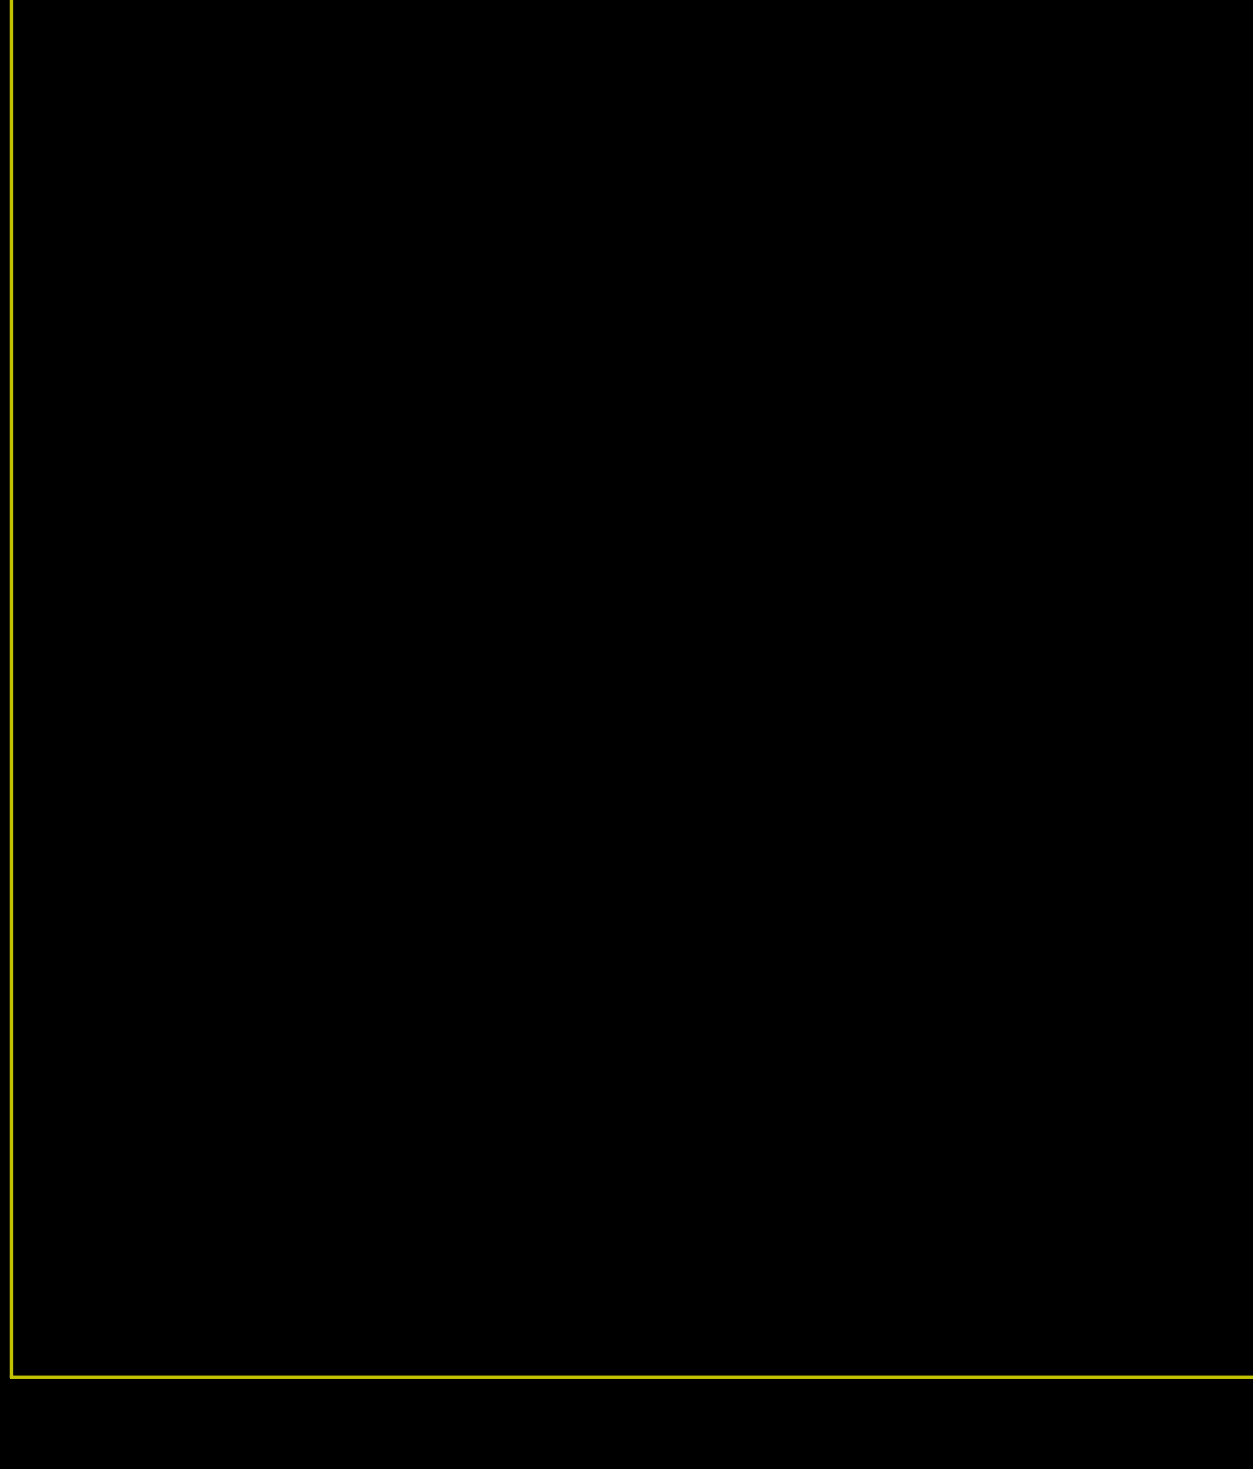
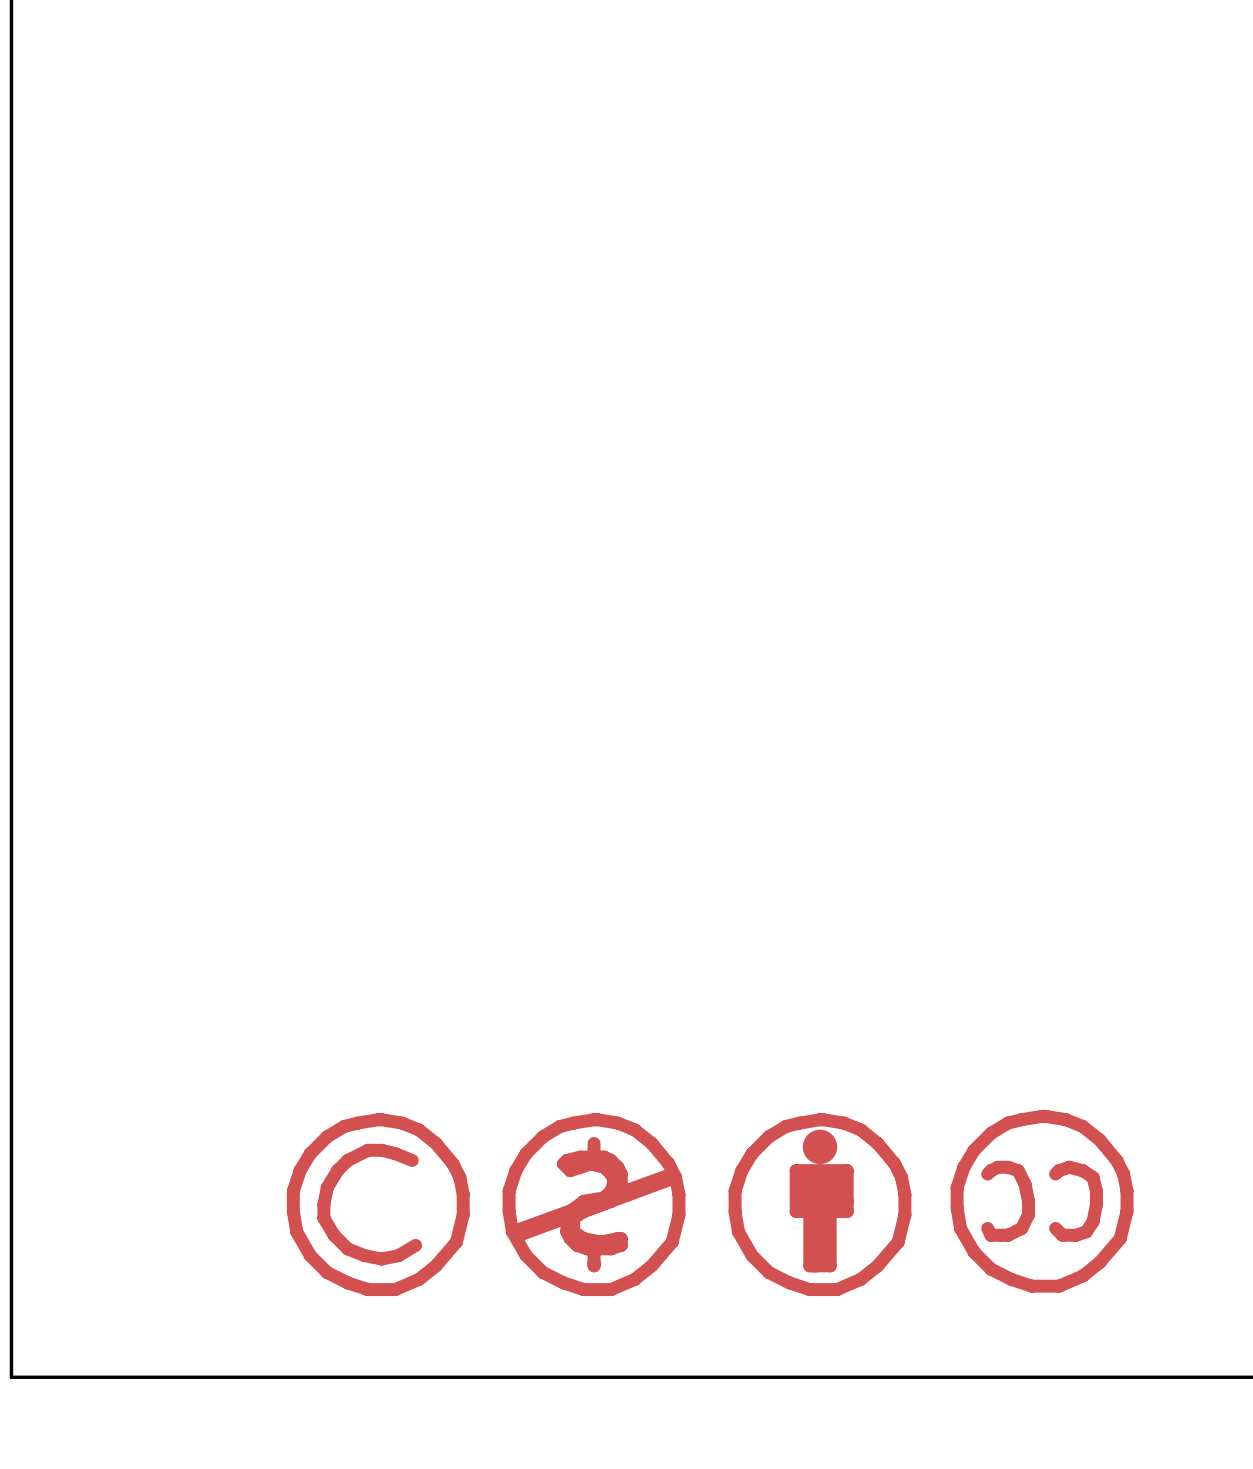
drawing: none -> [728, 1109, 1134, 1297]
drawing: none -> [286, 1113, 686, 1297]

